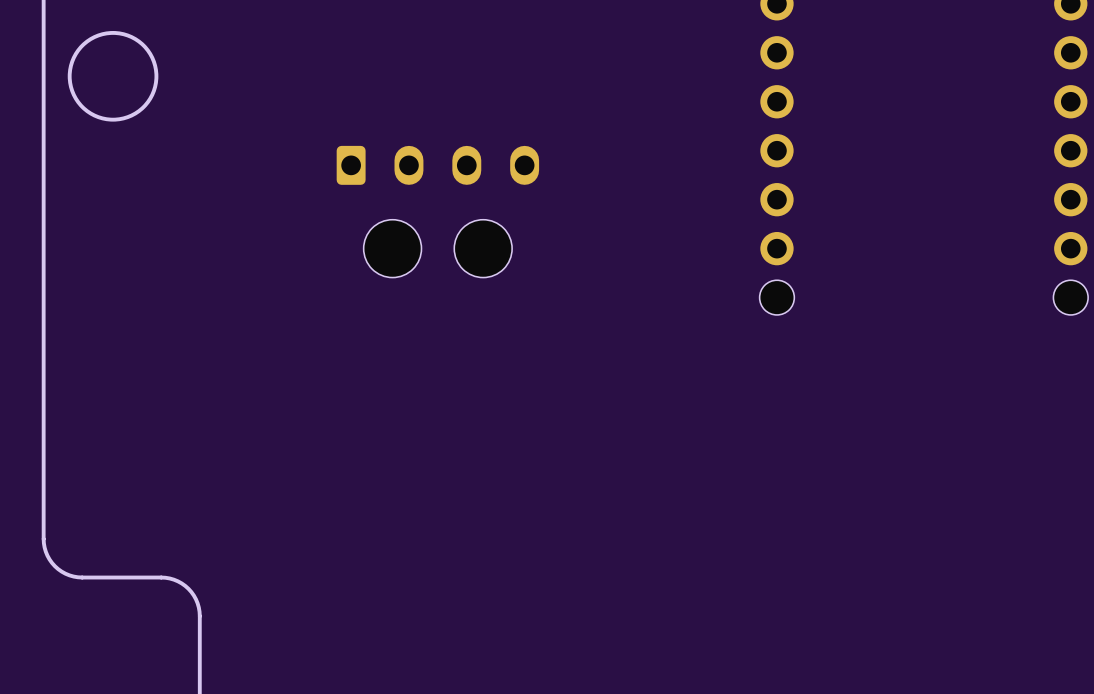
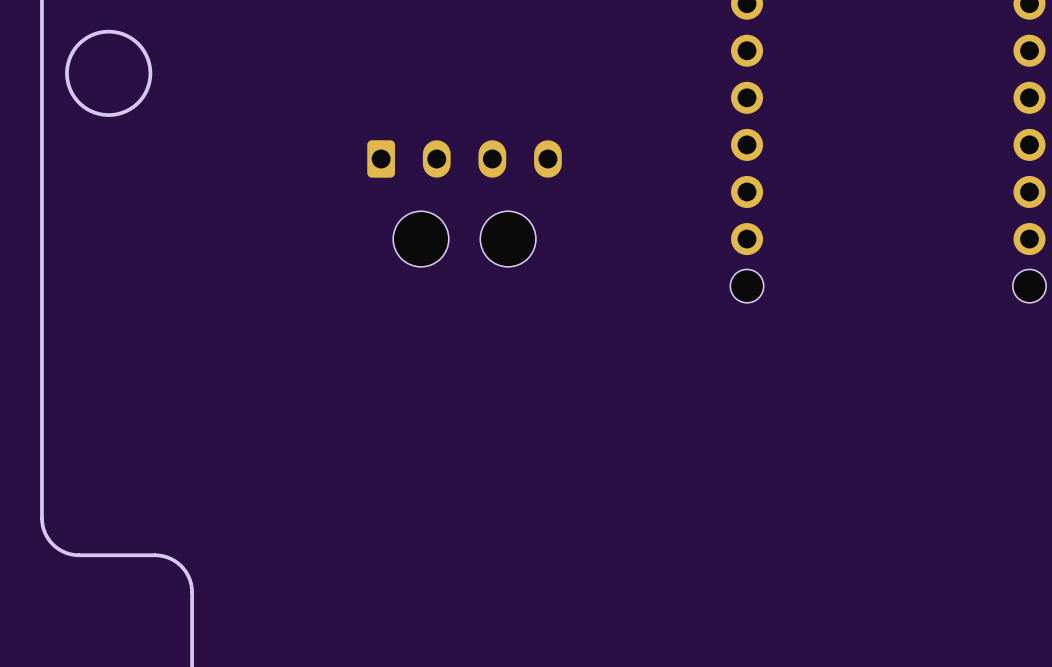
part position: (437, 211) -> (464, 203)

